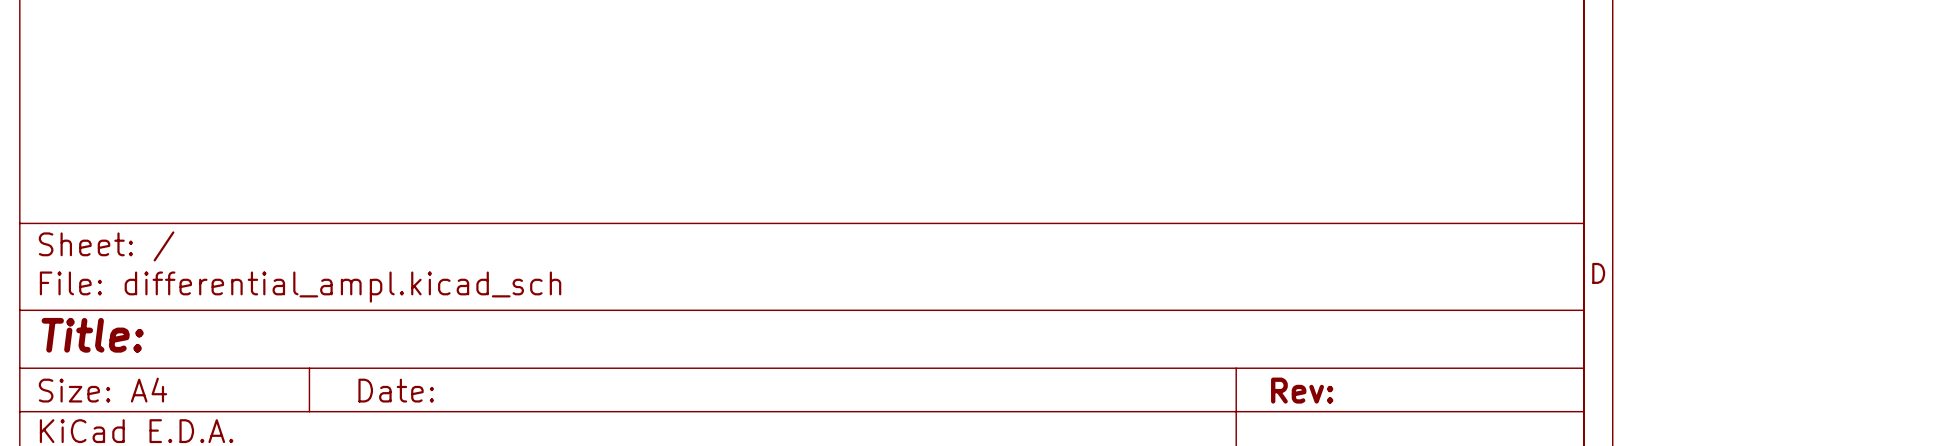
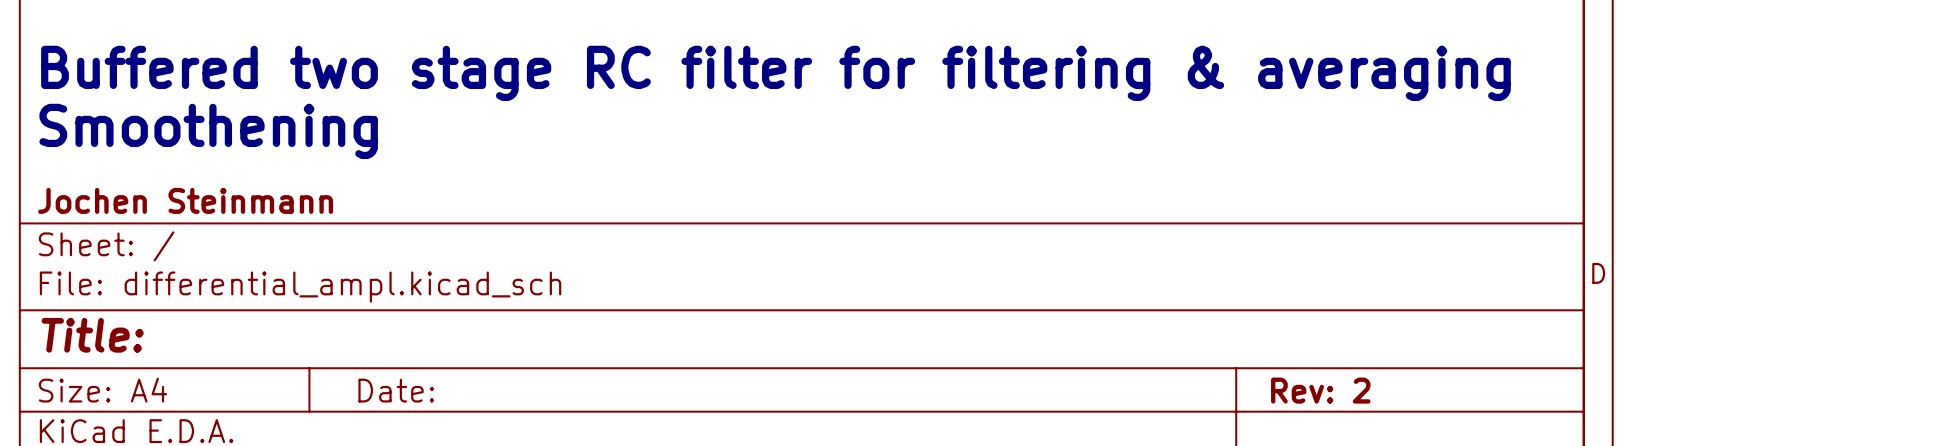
text: none -> Buffered two stage RC filter for filtering & averaging (775, 73)
text: none -> Smoothening (208, 131)
title block: none -> Jochen Steinmann (185, 200)
title block: Rev: (1302, 390) -> Rev: 2 (1320, 390)

